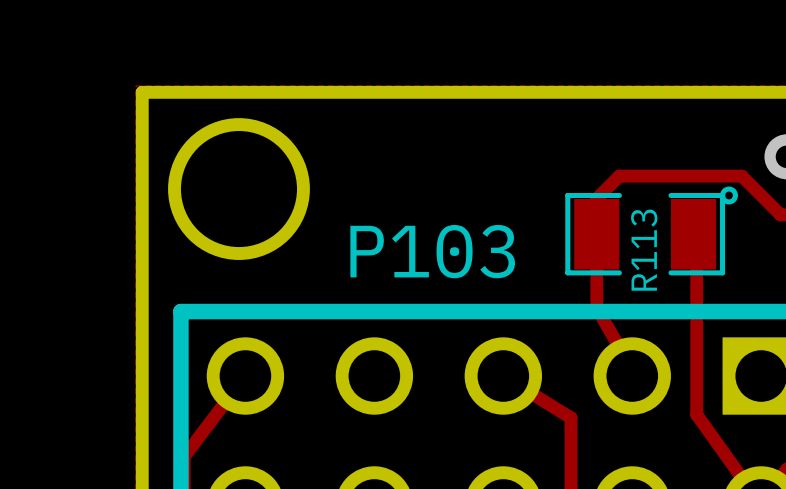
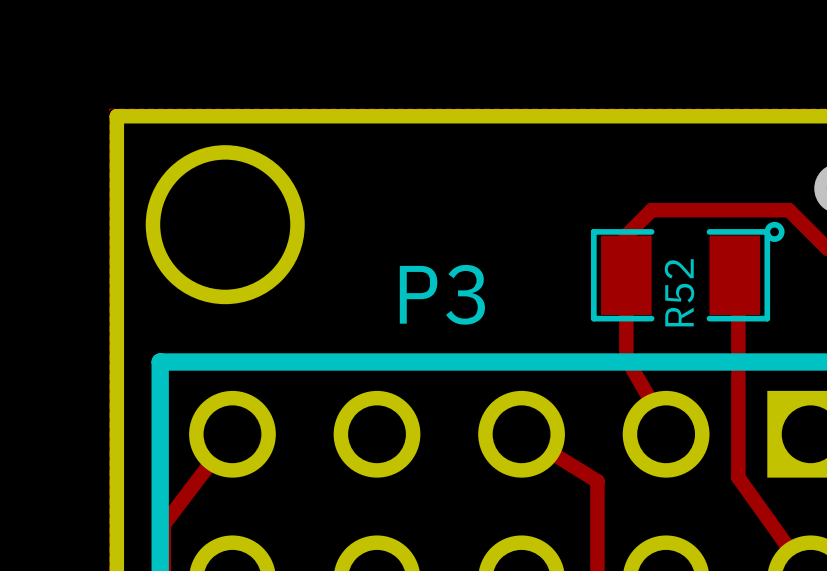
R113 name: R113 (644, 250) -> R52 (679, 292)
P103 name: P103 (432, 251) -> P3 (442, 294)

